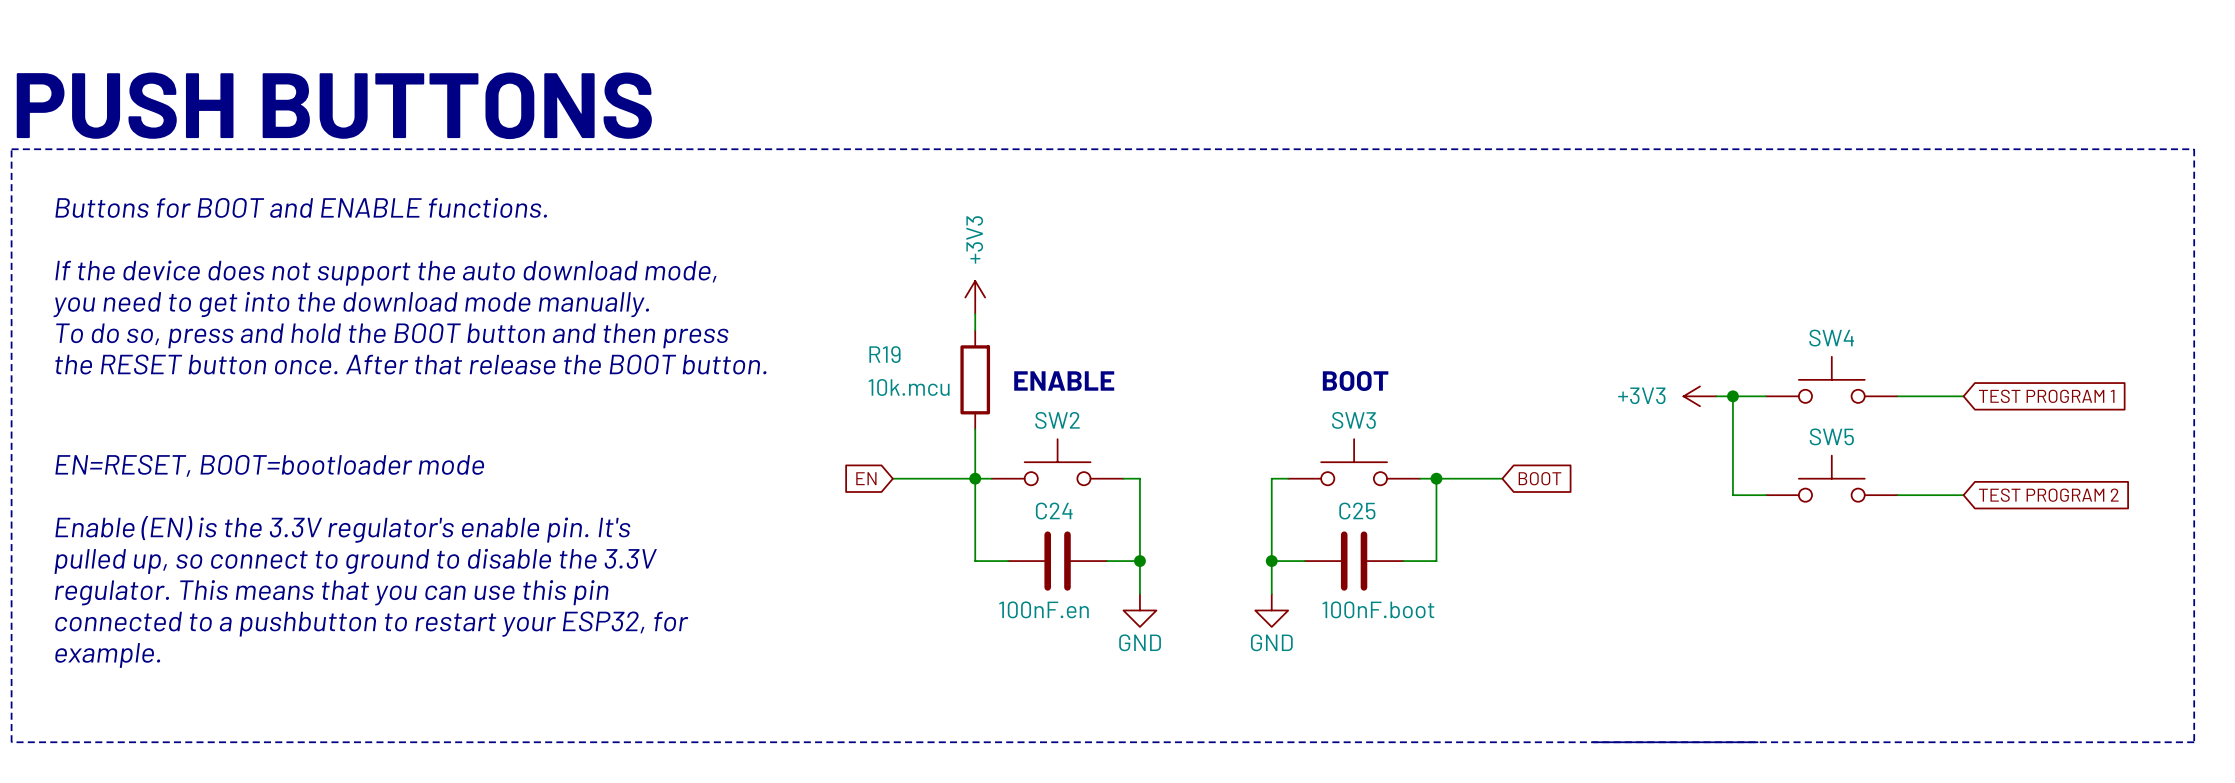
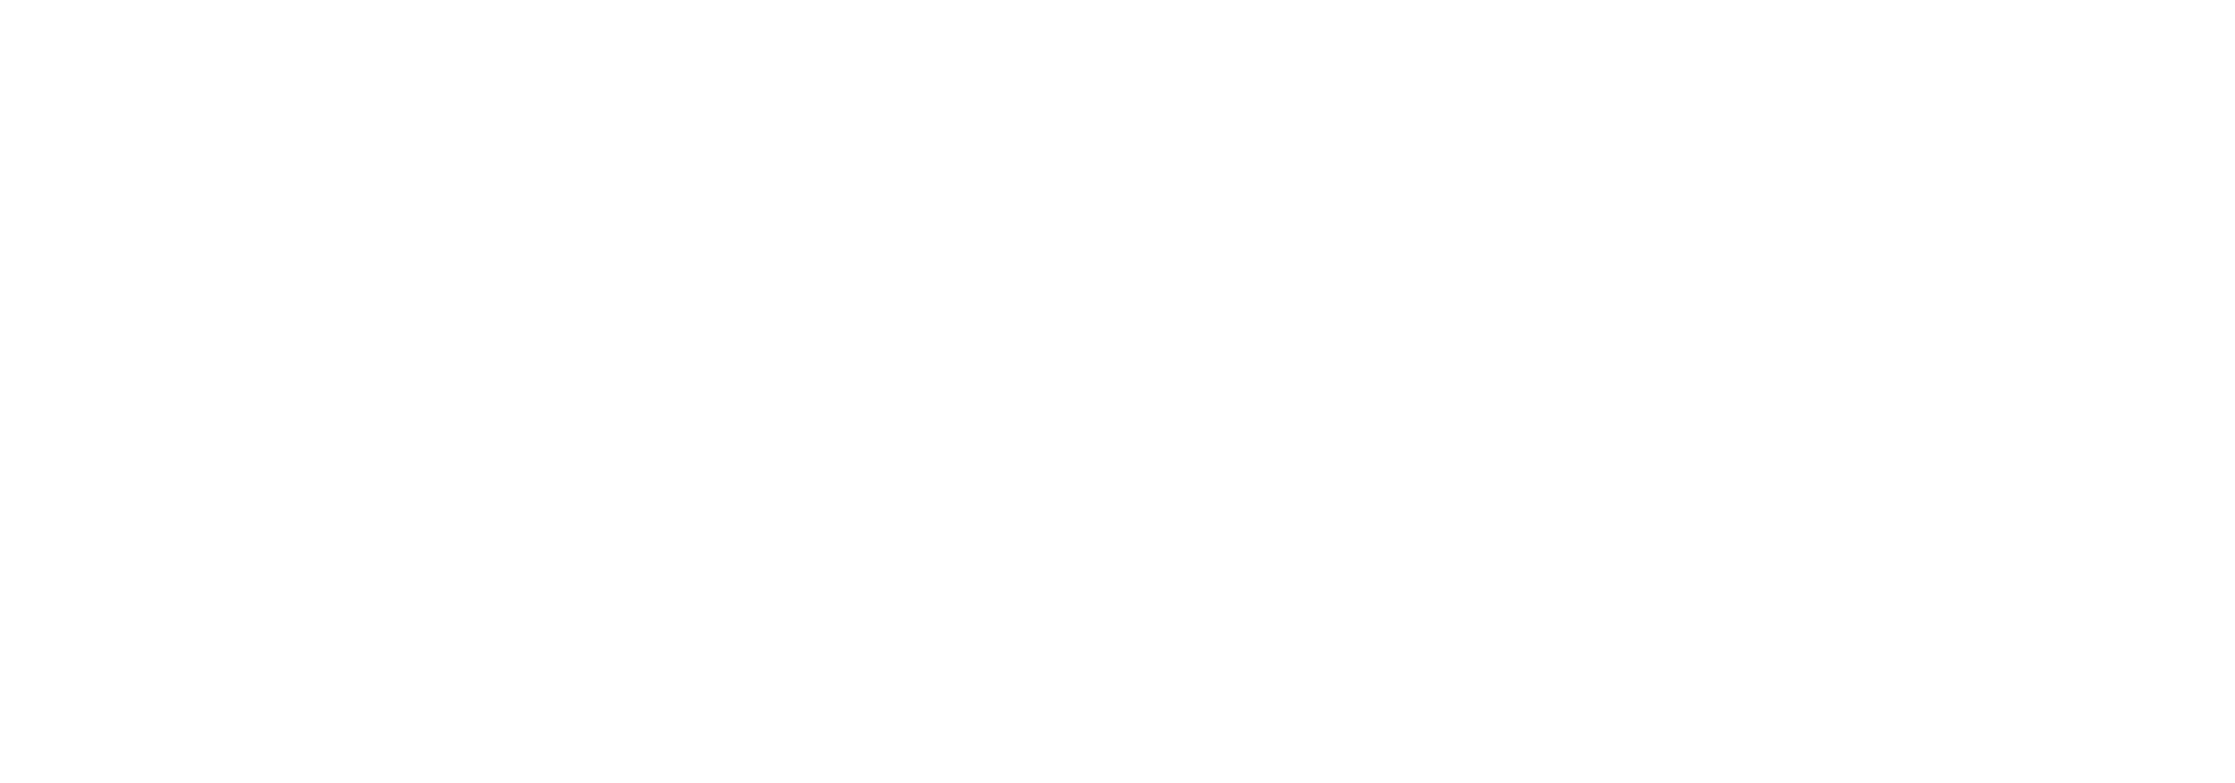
text: PUSH BUTTONS (334, 105) -> none
line: (11, 149) (2194, 149) (2194, 742) (11, 742) (11, 149) -> none
text: Buttons for BOOT and ENABLE functions. (301, 207) -> none
text: If the device does not support the auto download mode, (385, 273) -> none
power symbol: +3V3 (975, 297) -> none
text: you need to get into the download mode manually. (351, 304) -> none
wire: (975, 313) (975, 330) -> none
text: To do so, press and hold the BOOT button and then press (392, 335) -> none
text: the RESET button once. After that release the BOOT button. (410, 364) -> none
R19: 10k.mcu (975, 379) -> none
SW4: (1831, 379) -> none
text: ENABLE (1064, 380) -> none
text: BOOT (1355, 381) -> none
power symbol: +3V3 (1700, 396) -> none
wire: (1716, 396) (1765, 396) -> none
wire: (1732, 396) (1732, 495) (1765, 495) -> none
junction: (1732, 396) -> none
wire: (1897, 396) (1963, 396) -> none
global label: TEST PROGRAM 1 (2046, 396) -> none
wire: (975, 429) (975, 561) (1008, 561) -> none
SW2: (1057, 462) -> none
SW3: (1354, 462) -> none
text: EN=RESET, BOOT=bootloader mode (269, 465) -> none
global label: EN (866, 478) -> none
wire: (892, 478) (991, 478) -> none
junction: (975, 478) -> none
wire: (1123, 478) (1139, 478) (1139, 594) -> none
wire: (1288, 478) (1271, 478) (1271, 594) -> none
wire: (1419, 478) (1502, 478) -> none
wire: (1436, 478) (1436, 561) (1403, 561) -> none
junction: (1436, 478) -> none
global label: BOOT (1540, 478) -> none
SW5: (1831, 478) -> none
wire: (1897, 495) (1963, 495) -> none
global label: TEST PROGRAM 2 (2048, 495) -> none
text: Enable (EN) is the 3.3V regulator's enable pin. It's (342, 529) -> none
text: pulled up, so connect to ground to disable the 3.3V (355, 561) -> none
C24: 100nF.en (1057, 561) -> none
wire: (1107, 561) (1139, 561) -> none
junction: (1139, 561) -> none
wire: (1271, 561) (1304, 561) -> none
junction: (1271, 561) -> none
C25: 100nF.boot (1354, 561) -> none
text: regulator. This means that you can use this pin (331, 592) -> none
power symbol: GND (1139, 610) -> none
power symbol: GND (1271, 610) -> none
text: connected to a pushbutton to restart your ESP32, for (371, 624) -> none
text: example. (107, 655) -> none
line: (1592, 742) (1757, 742) -> none

